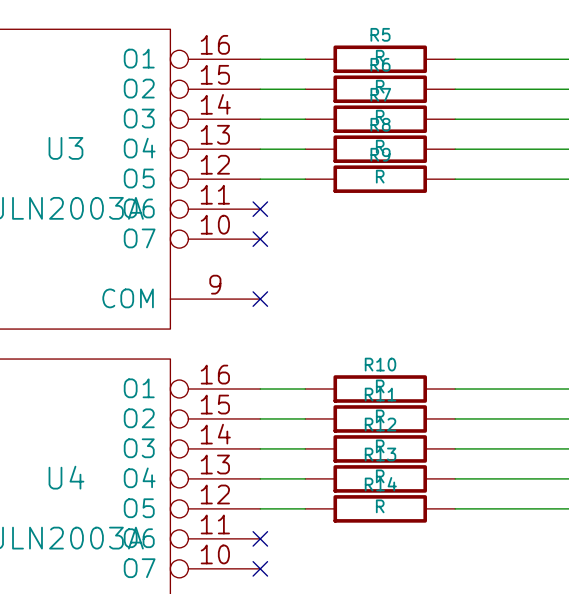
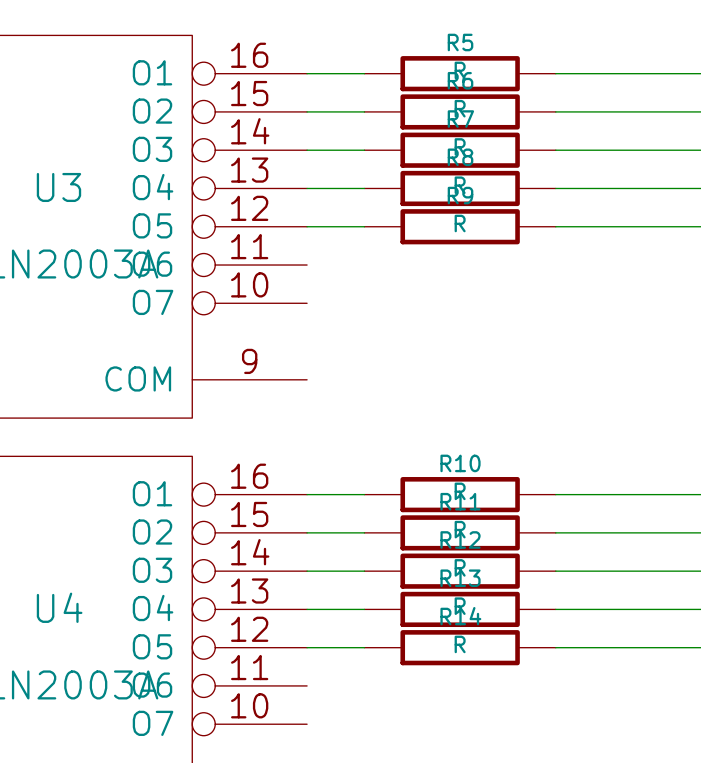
no-connect mark: (260, 209) -> none
no-connect mark: (260, 239) -> none
no-connect mark: (260, 299) -> none
no-connect mark: (260, 538) -> none
no-connect mark: (260, 568) -> none

